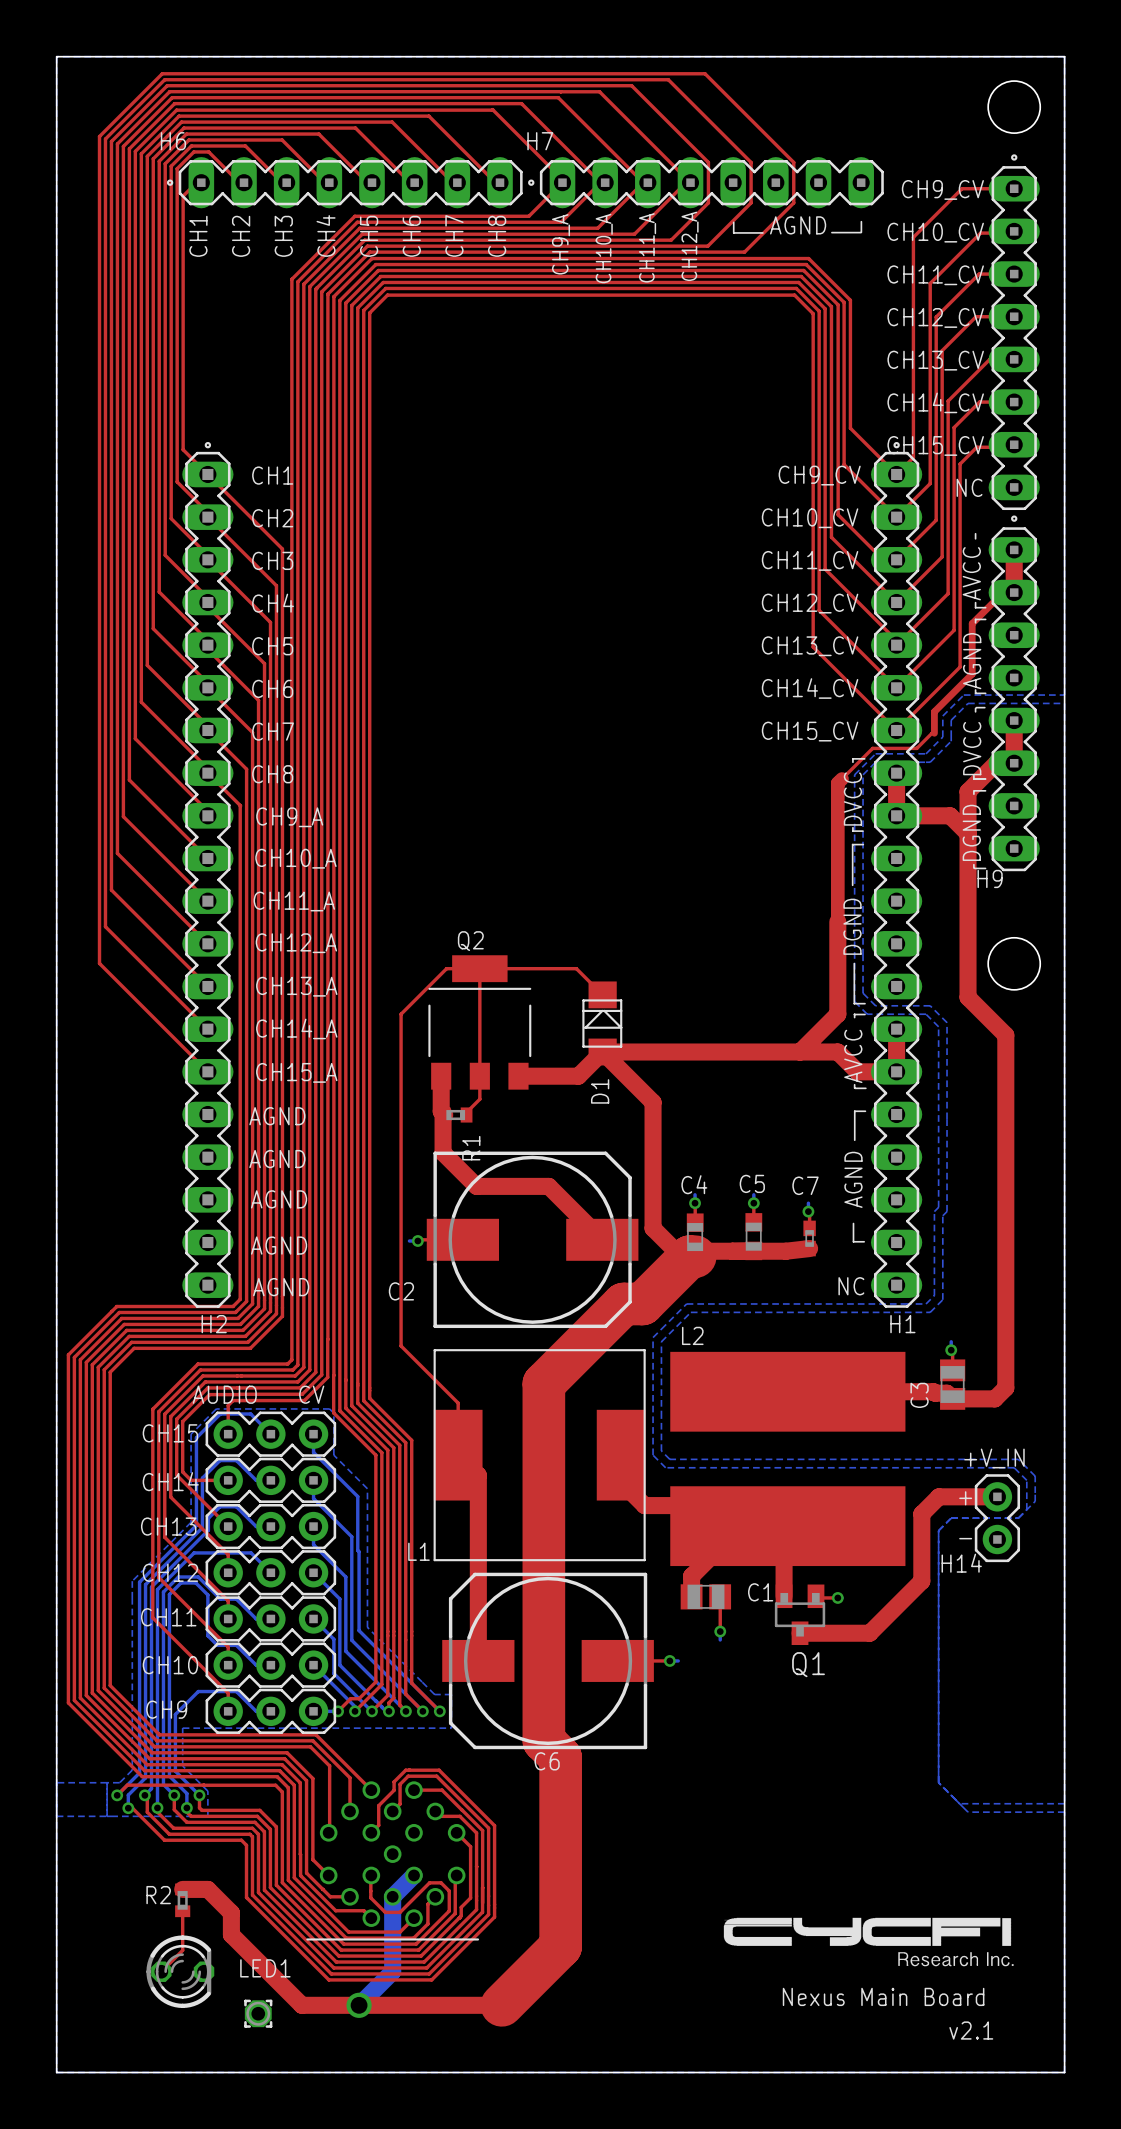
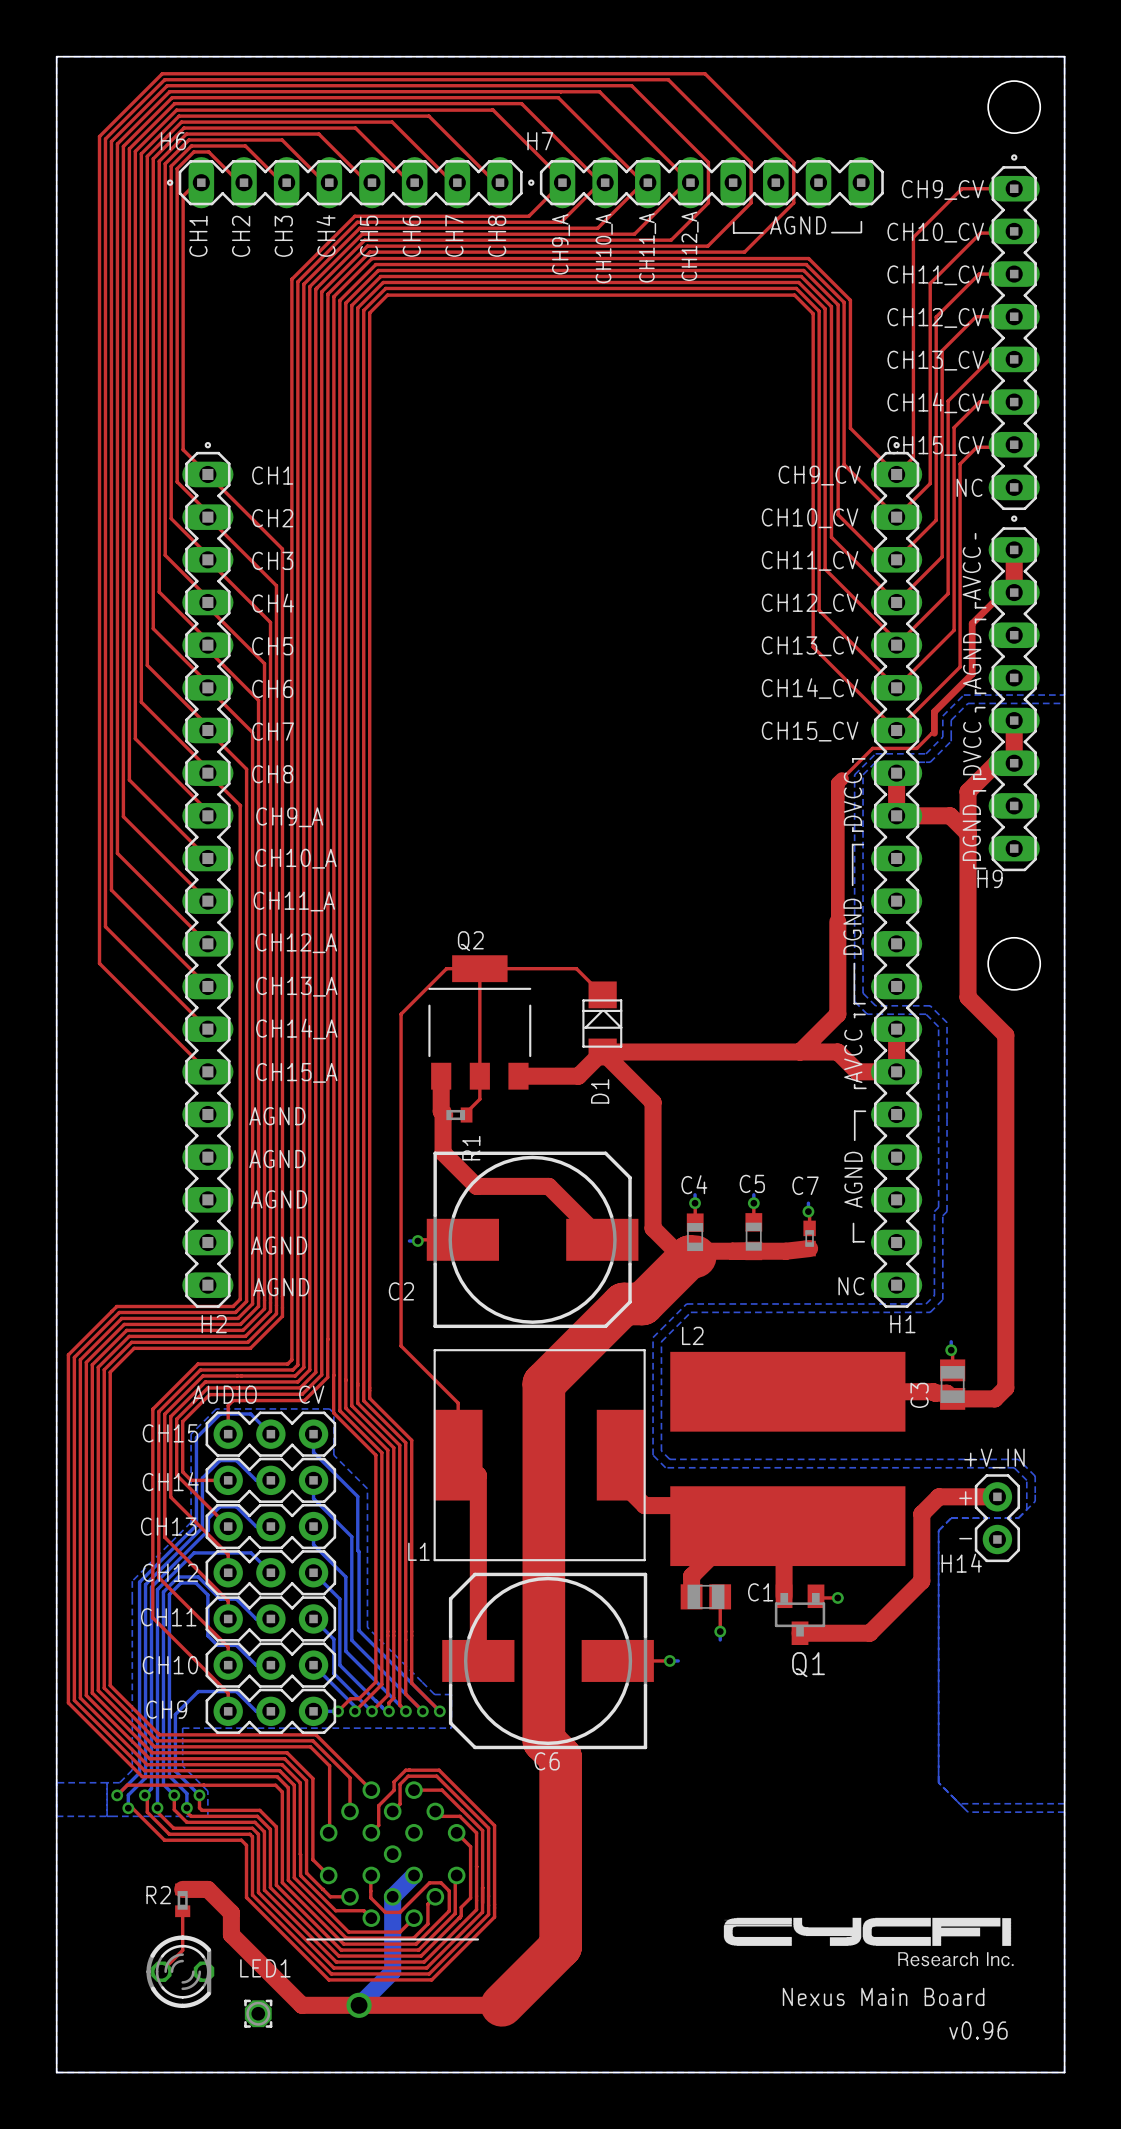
text: v2.1 (971, 2030) -> v0.96 (978, 2030)

